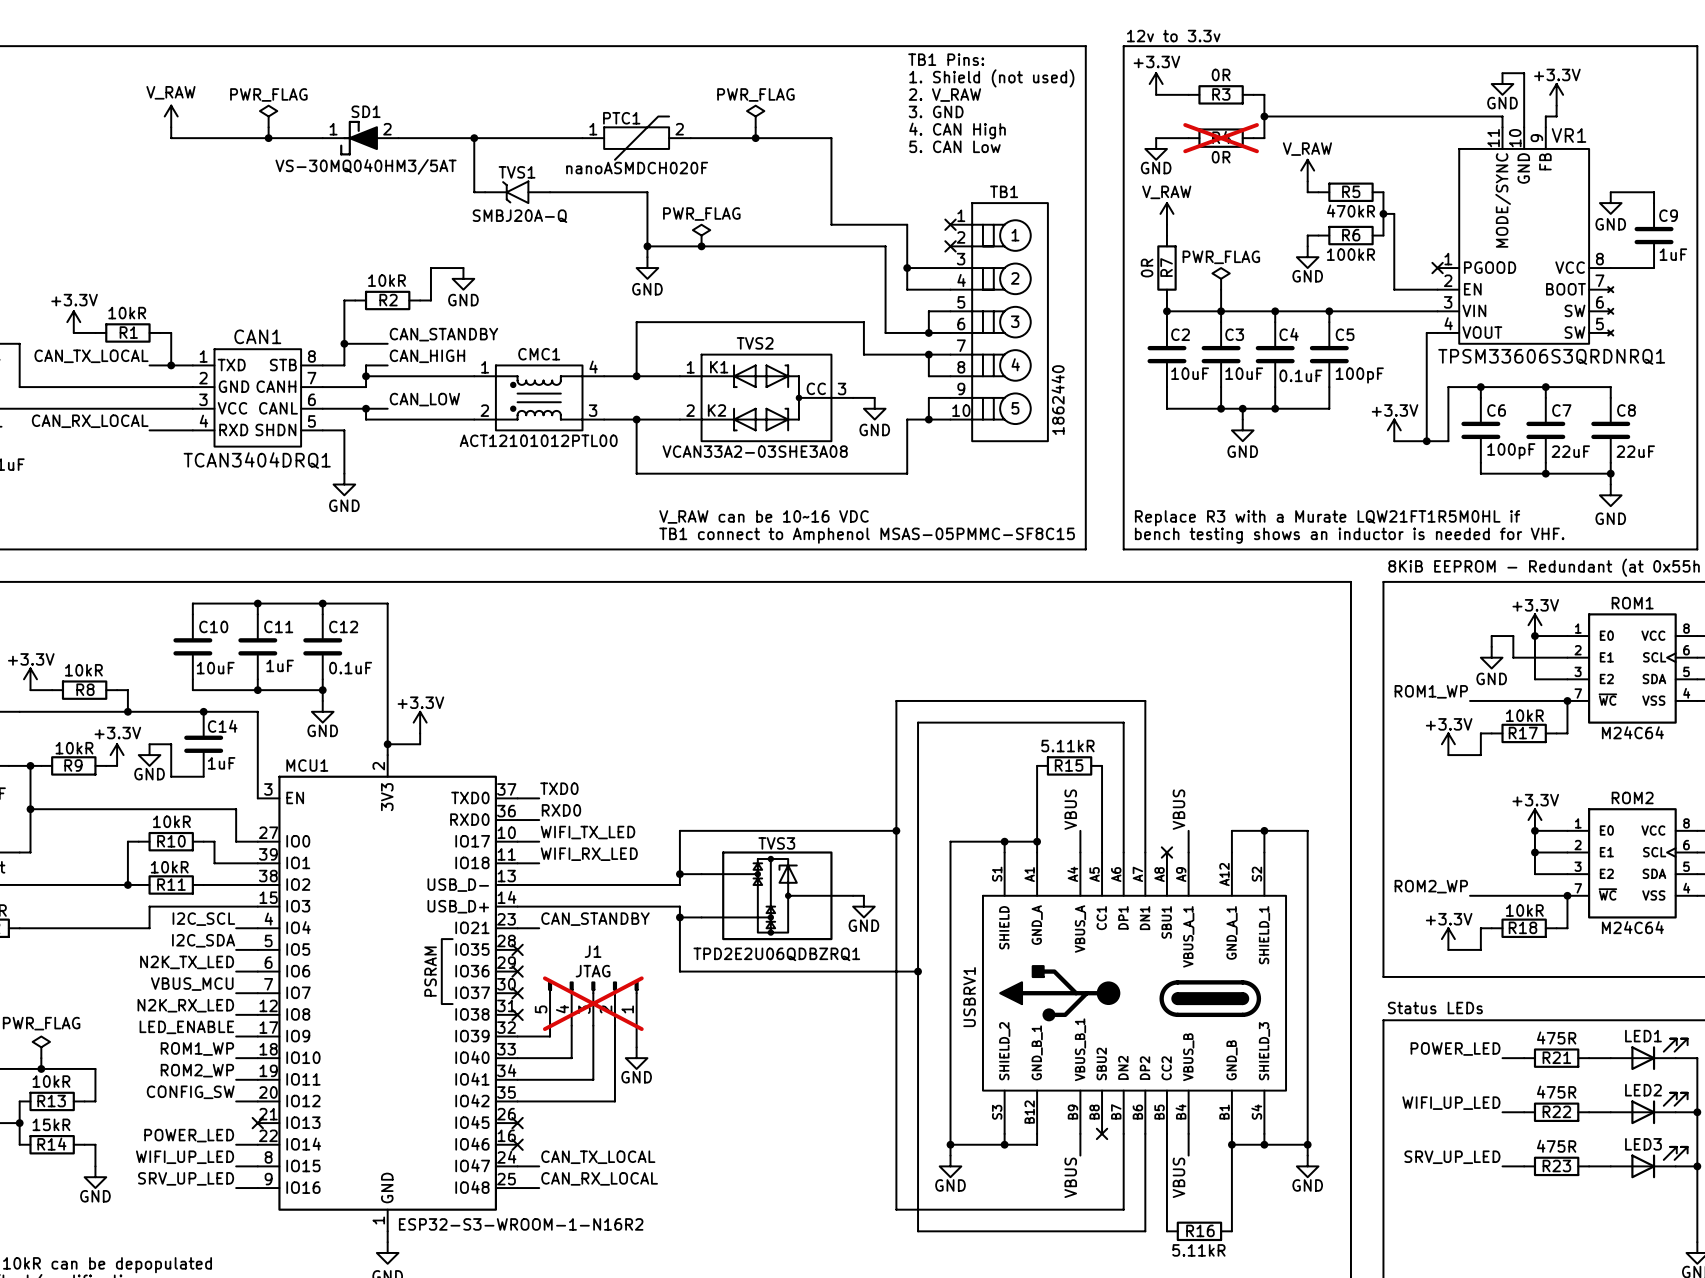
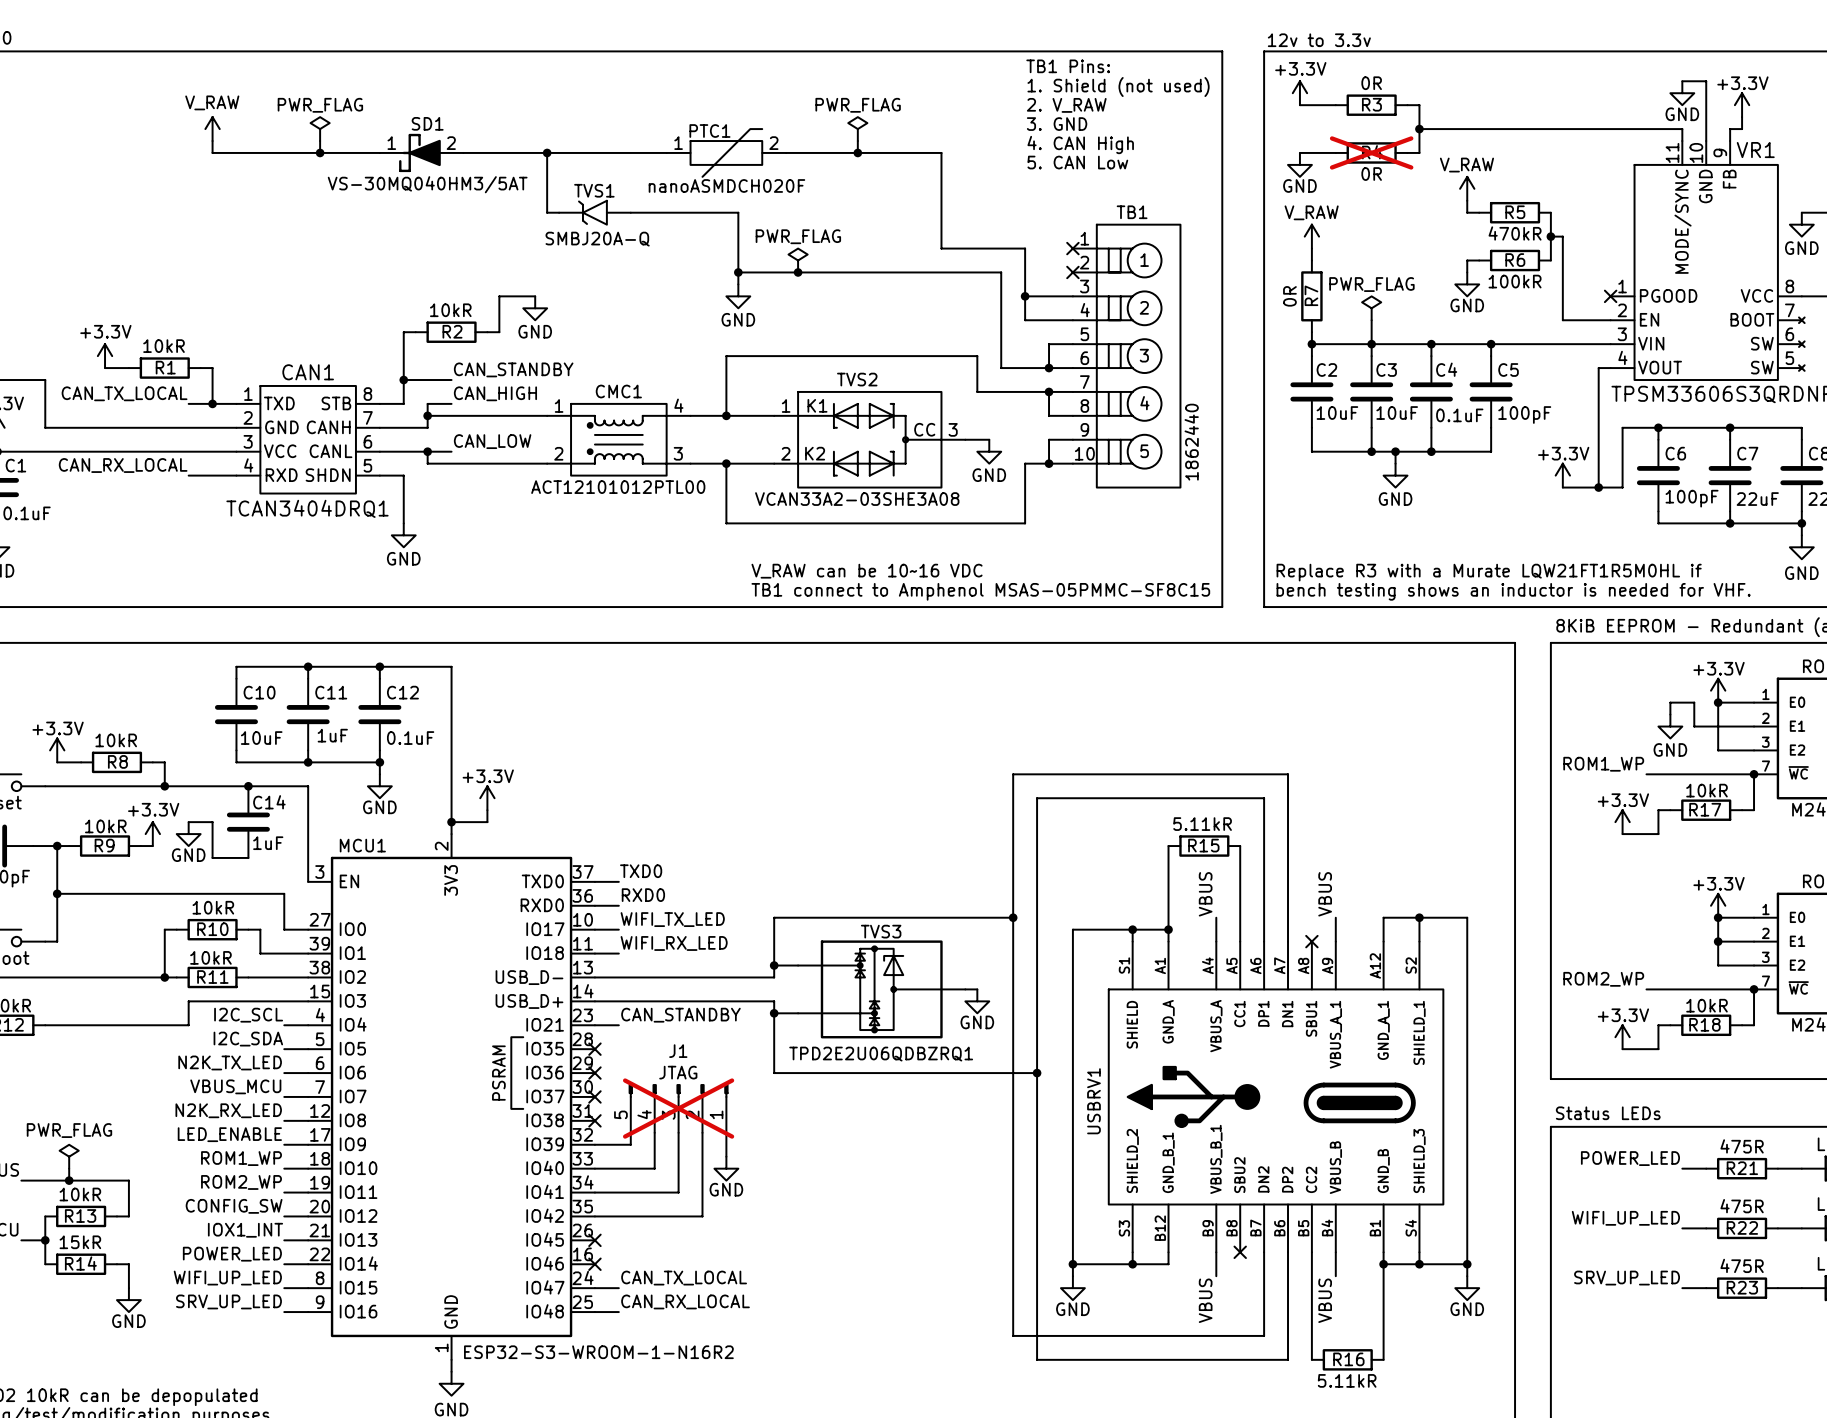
label: none -> IOX1_INT (245, 1230)
wire: none -> (284, 1240) (308, 1240)
no-connect mark: (257, 1123) -> none

